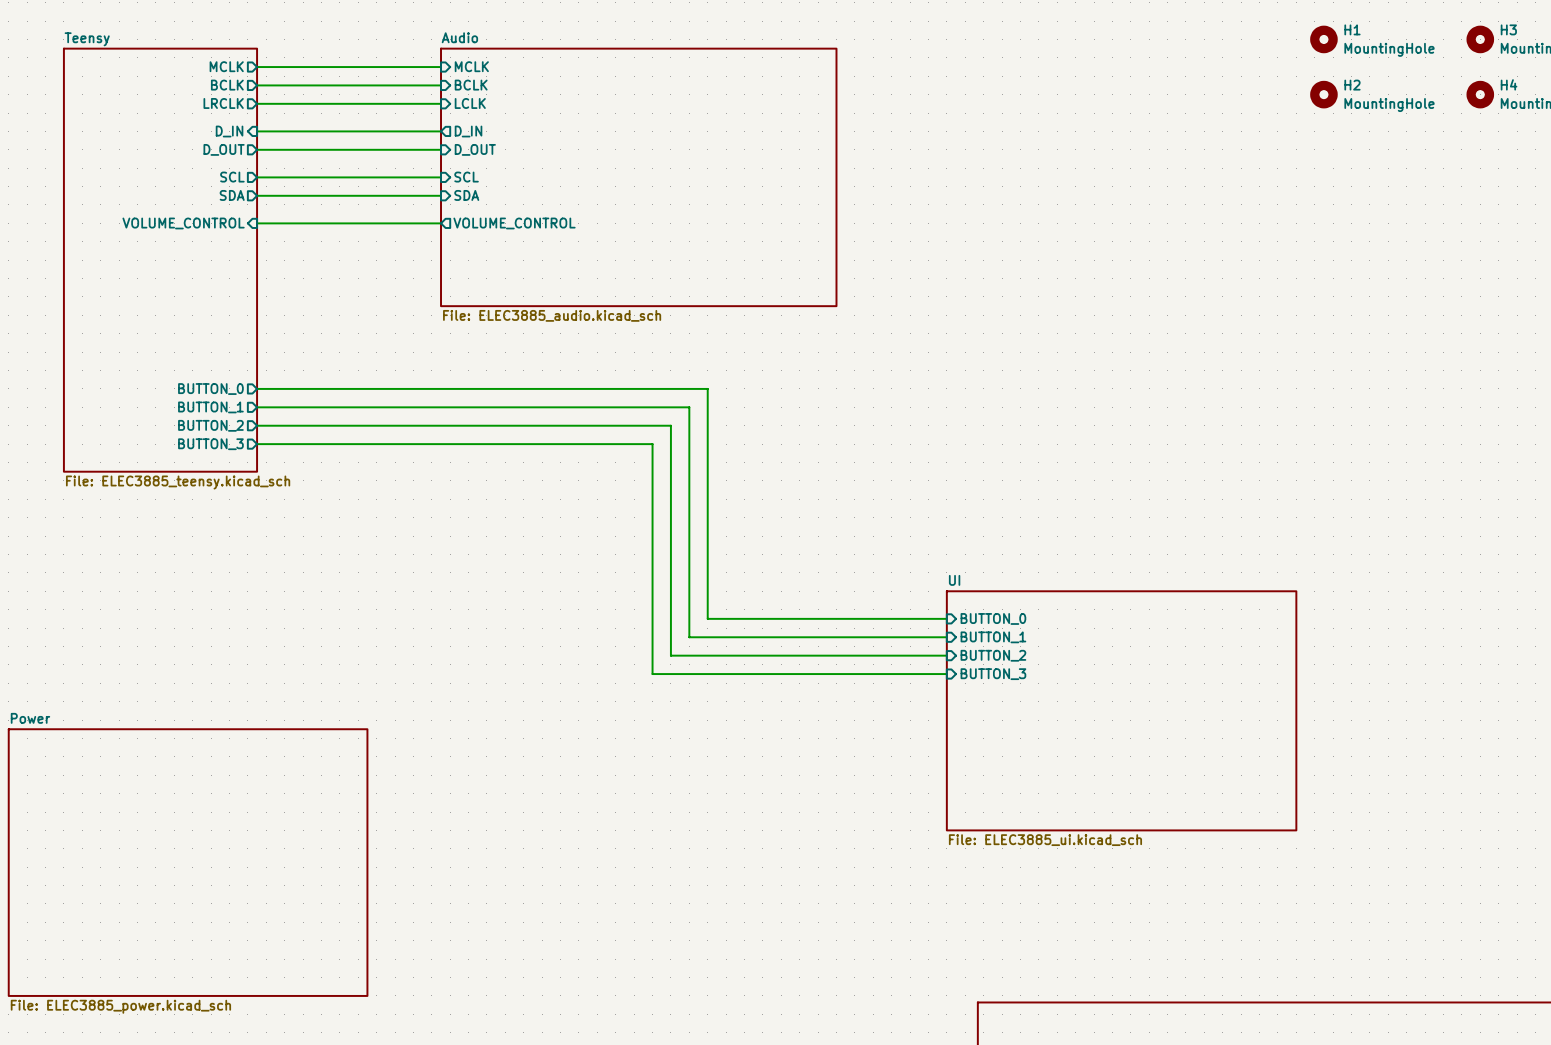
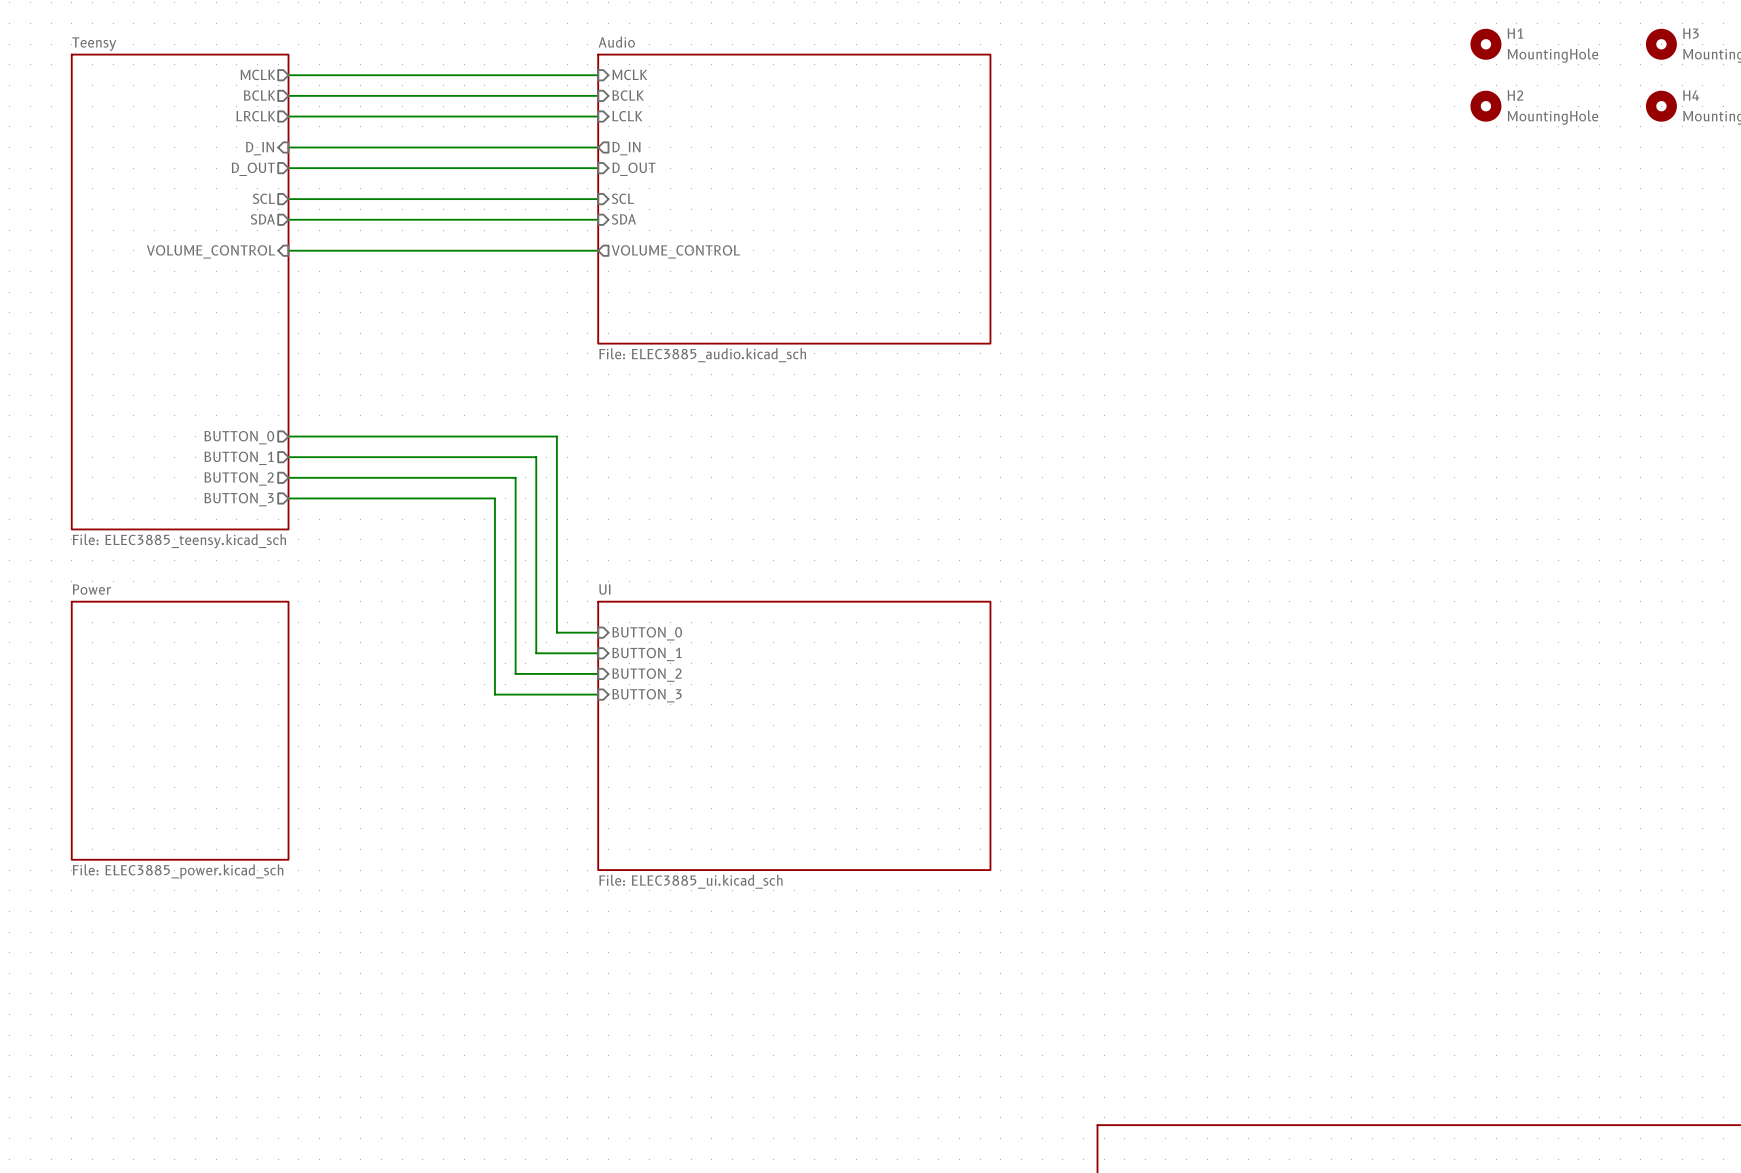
sheet pin position: MCLK (471, 66) -> MCLK (629, 74)
wire: none -> (494, 75) (598, 75)
wire: none -> (494, 95) (598, 95)
sheet pin position: BCLK (471, 85) -> BCLK (628, 95)
wire: none -> (494, 116) (598, 116)
sheet pin position: LCLK (470, 103) -> LCLK (627, 116)
wire: none -> (494, 147) (598, 147)
sheet pin position: D_IN (468, 131) -> D_IN (626, 148)
wire: none -> (494, 168) (598, 168)
sheet pin position: D_OUT (475, 149) -> D_OUT (634, 169)
wire: none -> (494, 199) (598, 199)
sheet pin position: SCL (466, 177) -> SCL (622, 198)
sheet Audio: File: ELEC3885_audio.kicad_sch (638, 177) -> none
sheet Audio: none -> File: ELEC3885_audio.kicad_sch (794, 199)
wire: none -> (494, 219) (598, 219)
sheet pin position: SDA (466, 195) -> SDA (623, 219)
wire: none -> (494, 250) (598, 250)
sheet pin position: VOLUME_CONTROL (514, 223) -> VOLUME_CONTROL (675, 251)
wire: (496, 388) (707, 388) (707, 618) (946, 618) -> (556, 436) (556, 632) (598, 632)
wire: (477, 407) (689, 407) (689, 637) (946, 637) -> (536, 457) (536, 653) (598, 653)
wire: (459, 425) (670, 425) (670, 655) (946, 655) -> (515, 477) (515, 673) (598, 673)
wire: (441, 444) (652, 444) (652, 674) (946, 674) -> (494, 498) (494, 694) (598, 694)
sheet pin: none -> BUTTON_0 (647, 633)
sheet pin: none -> BUTTON_1 (646, 654)
sheet pin: none -> BUTTON_2 (647, 675)
sheet pin: none -> BUTTON_3 (647, 695)
sheet pin: BUTTON_0 (993, 618) -> none
sheet pin: BUTTON_1 (993, 637) -> none
sheet Power: none -> File: ELEC3885_power.kicad_sch (180, 730)
sheet UI: none -> File: ELEC3885_ui.kicad_sch (794, 735)
sheet pin: BUTTON_2 (993, 655) -> none
sheet pin: BUTTON_3 (993, 674) -> none
sheet UI: File: ELEC3885_ui.kicad_sch (1121, 710) -> none
sheet Power: File: ELEC3885_power.kicad_sch (188, 862) -> none

